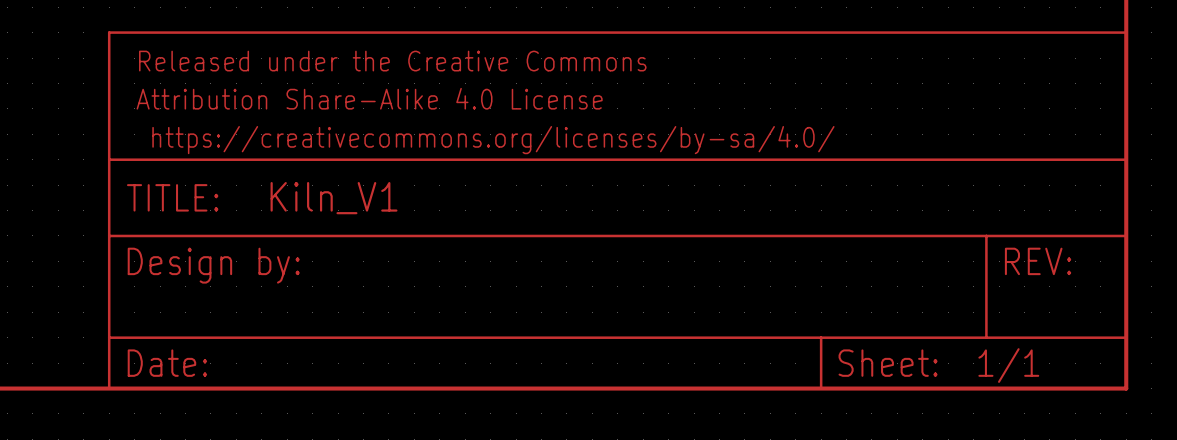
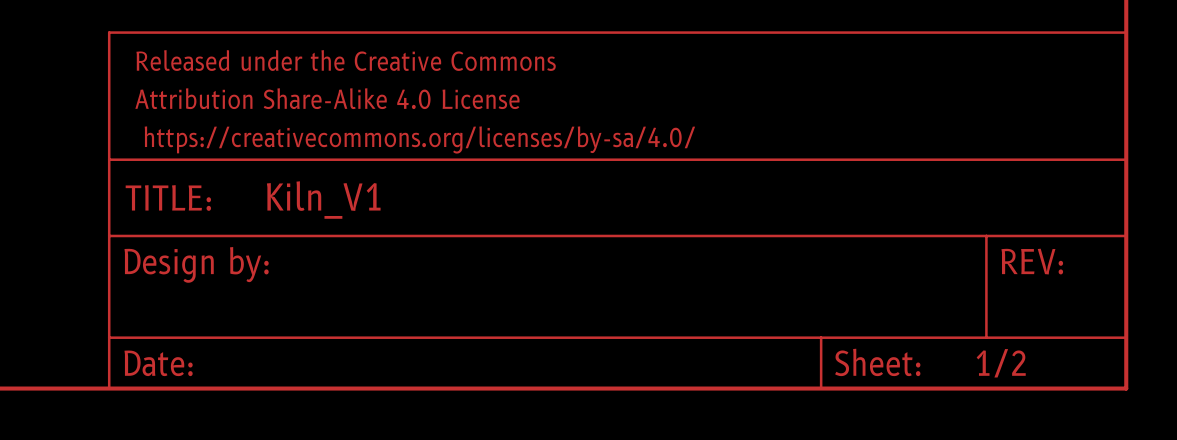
part text: 1/1 (1008, 365) -> 1/2 (1001, 363)

